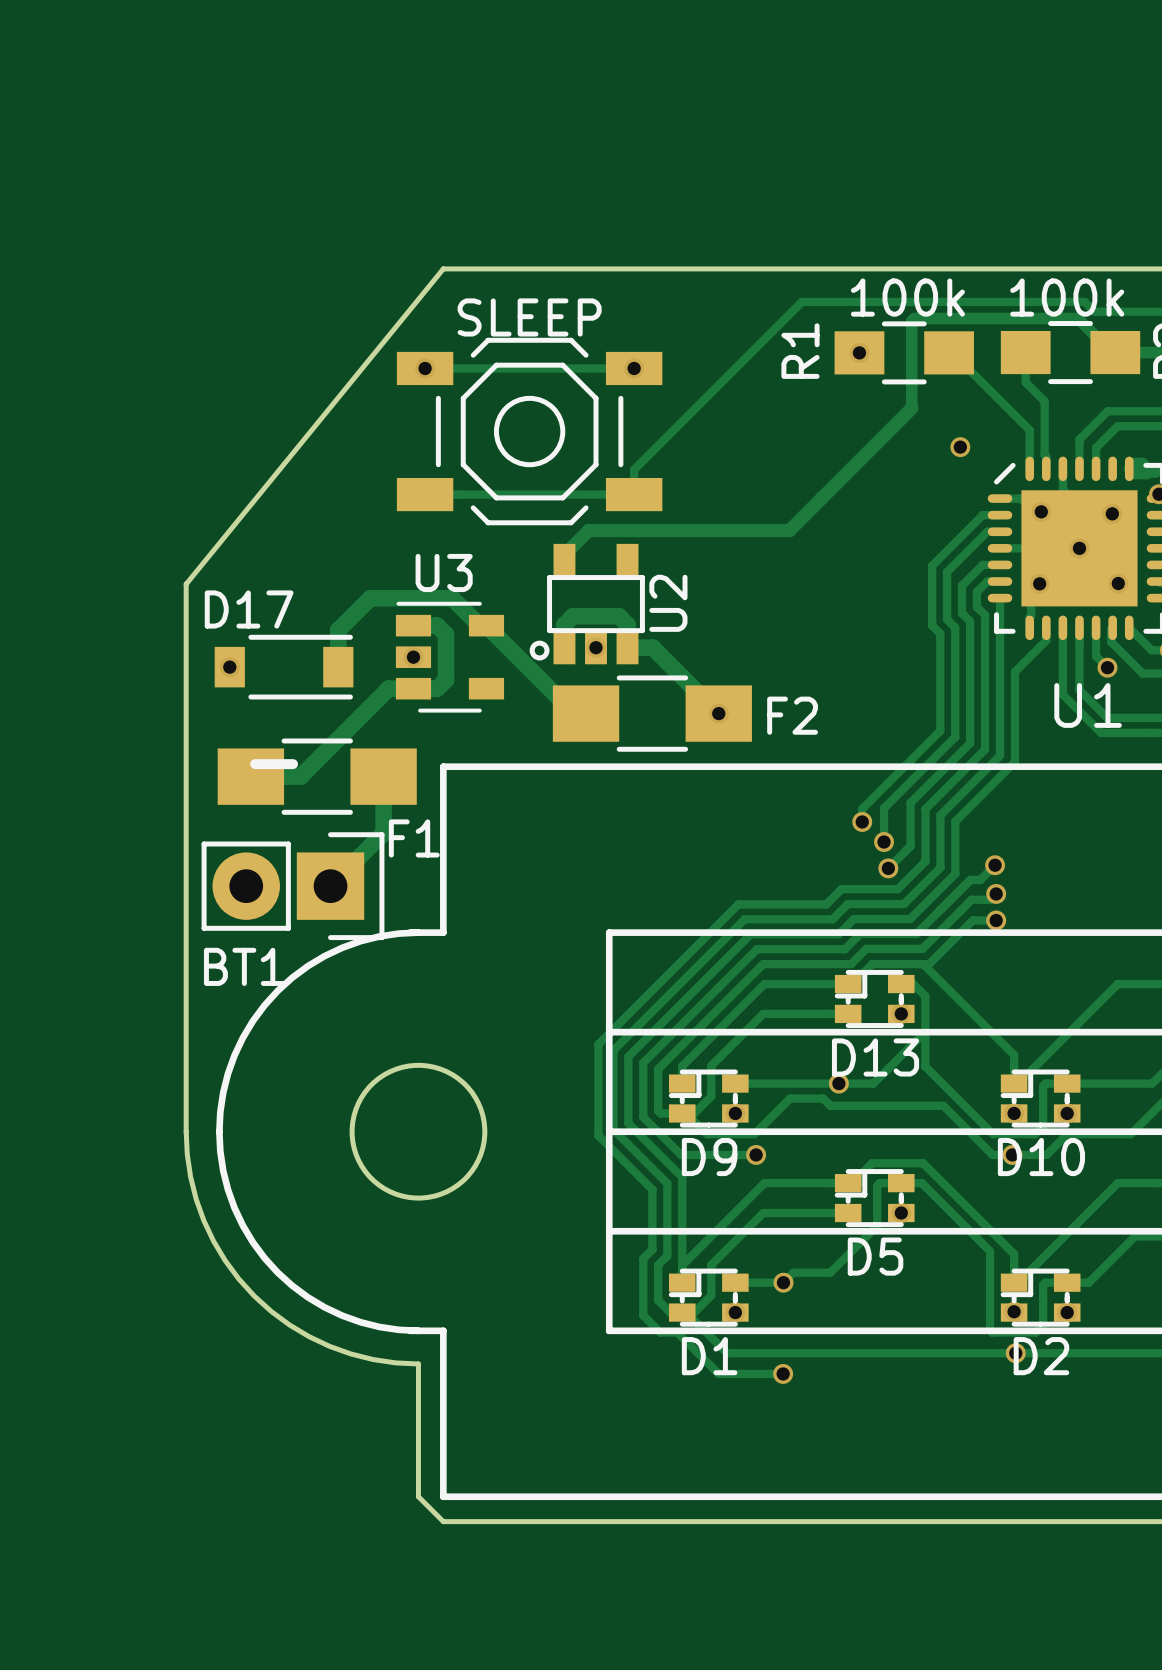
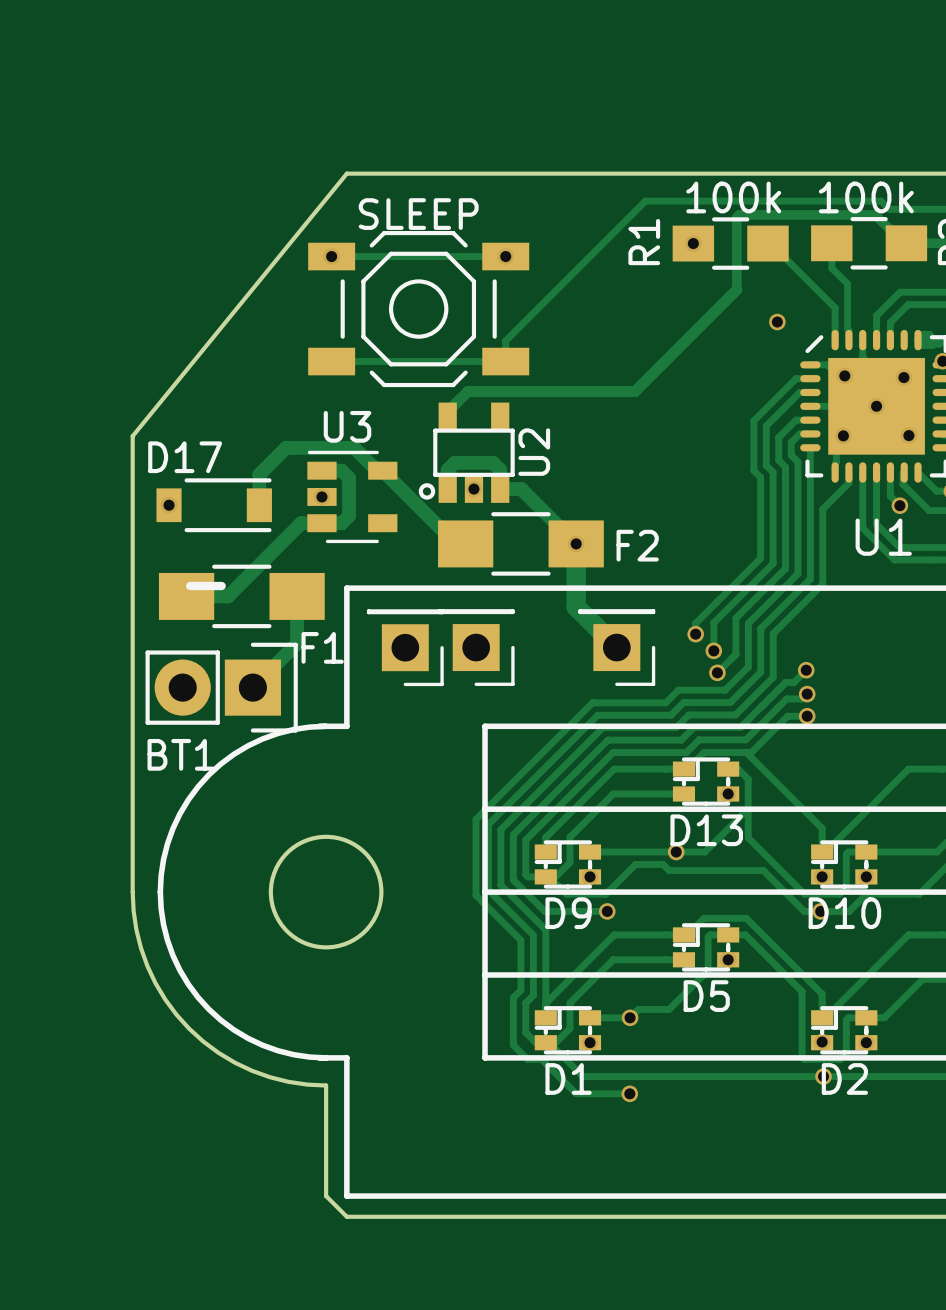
track: none -> (576, 543) (576, 606) (616, 647)
part: none -> (405, 647)
part: none -> (476, 647)
part: none -> (616, 647)

